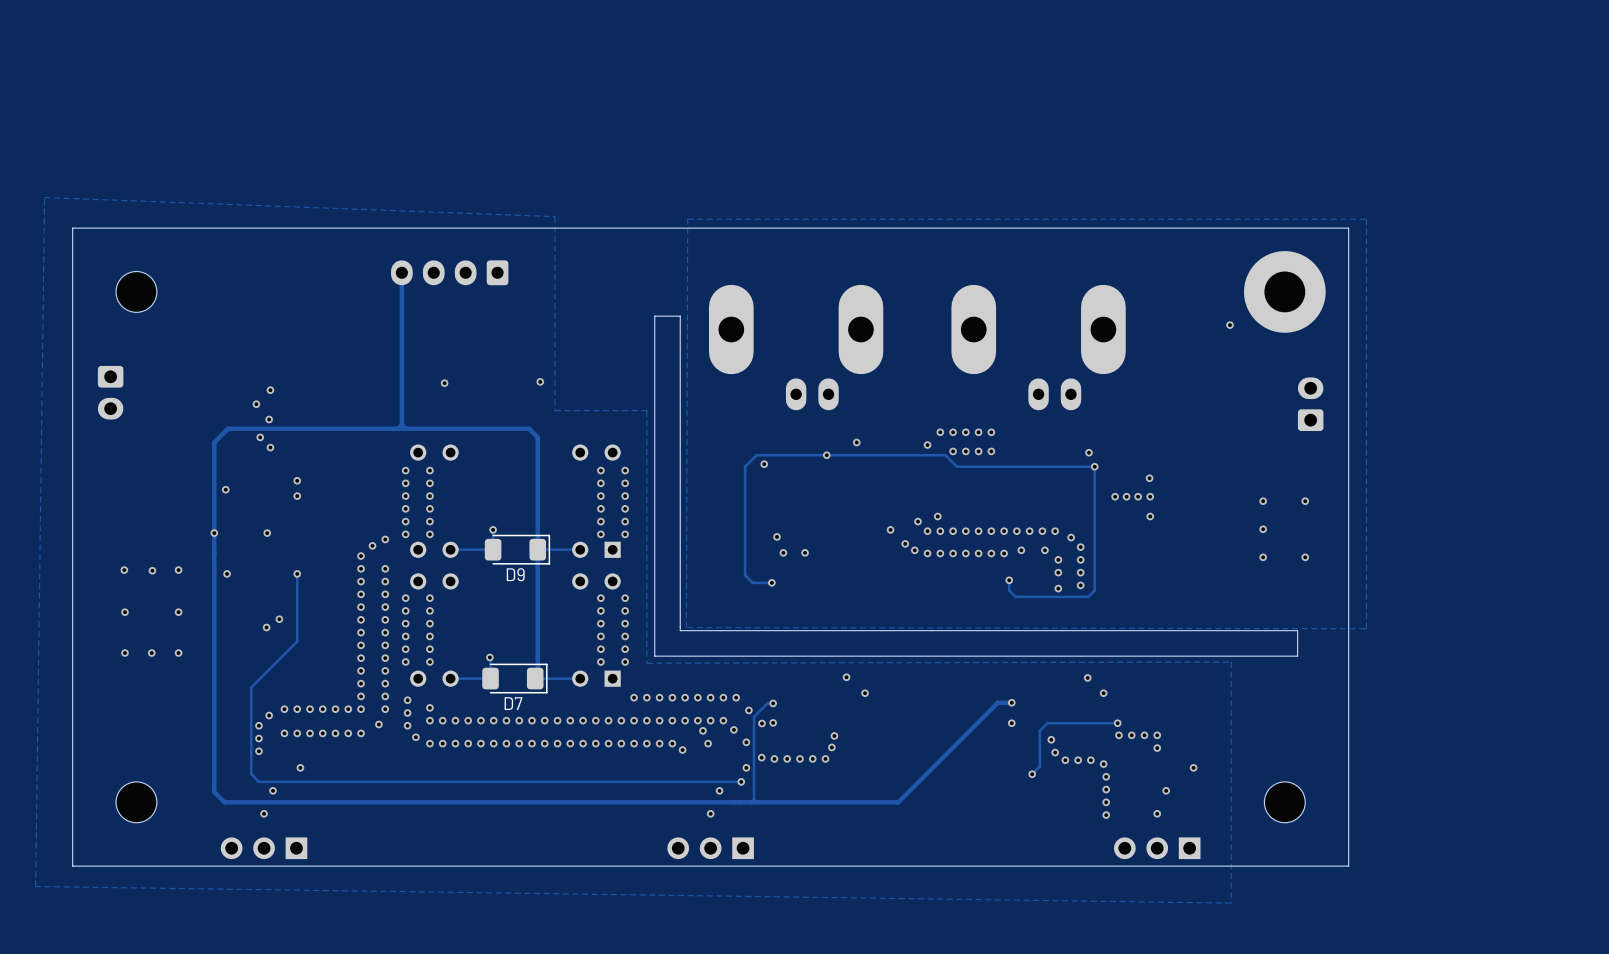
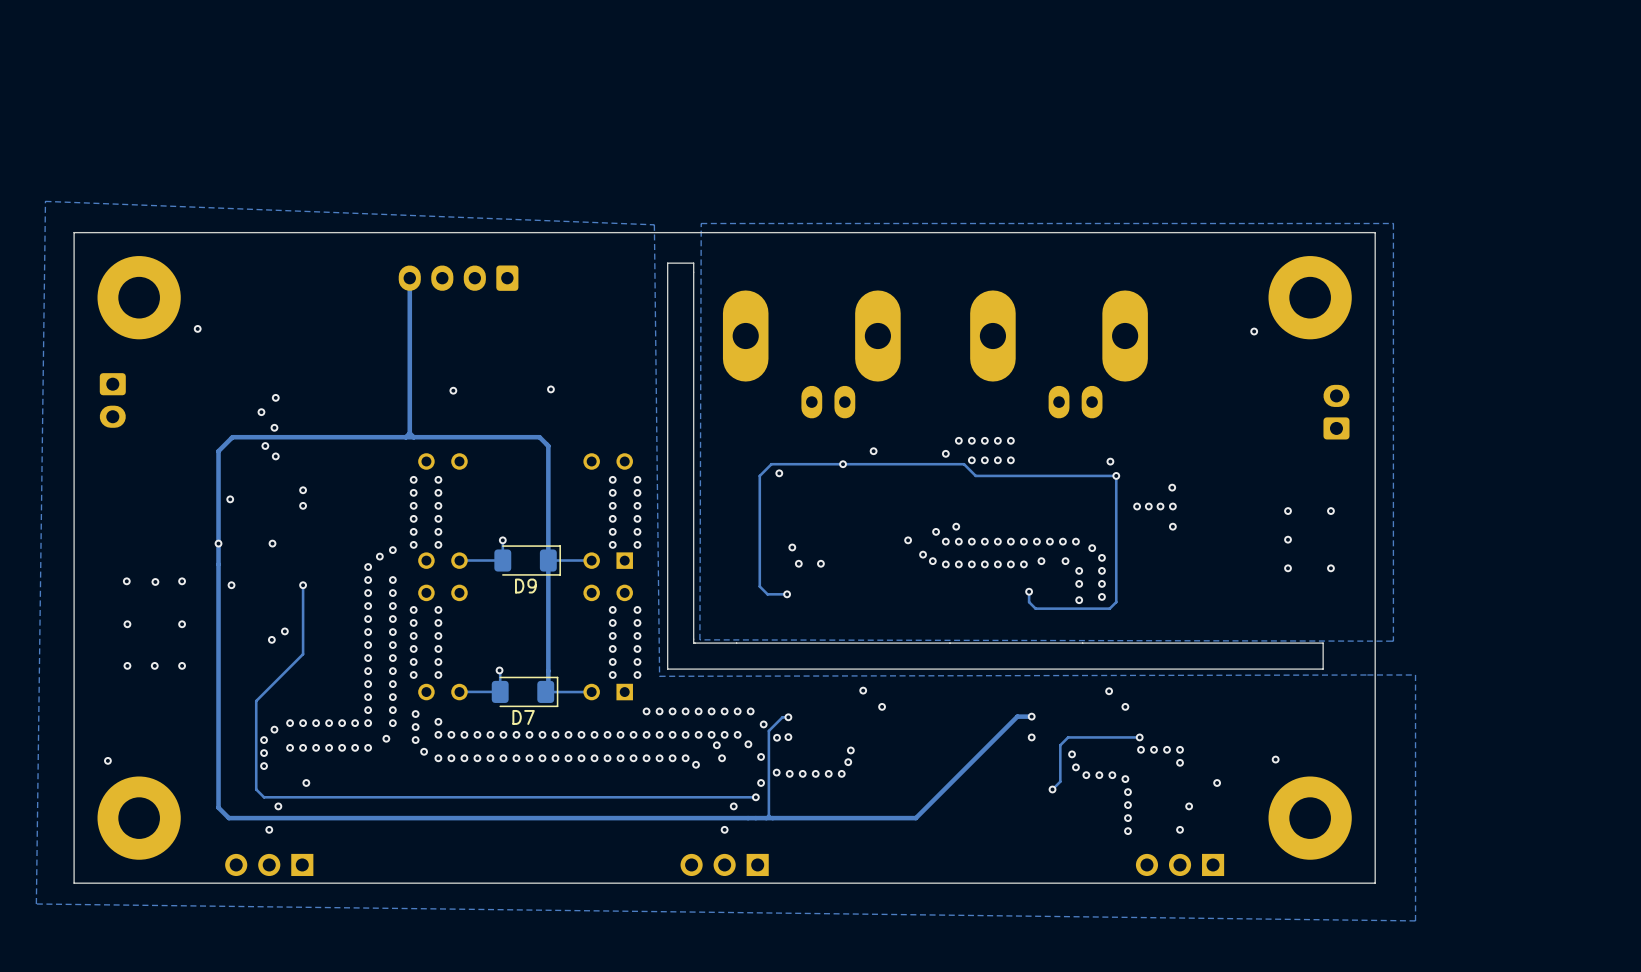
zone outline: (44, 197) (554, 216) (554, 410) (646, 410) (646, 663) (1231, 661) (1231, 903) (35, 886) -> (45, 201) (654, 224) (659, 676) (1415, 675) (1415, 920) (36, 903)
part footprint: [116, 271, 157, 313] -> [97, 256, 181, 340]
board edge: (680, 316) (654, 316) -> (693, 322) (693, 263) (667, 263) (667, 322)
via: none -> (197, 328)
via: none -> (1275, 759)
via: none -> (107, 760)
part footprint: [116, 781, 157, 823] -> [97, 776, 181, 860]
part footprint: [1264, 781, 1306, 823] -> [1268, 776, 1352, 860]

